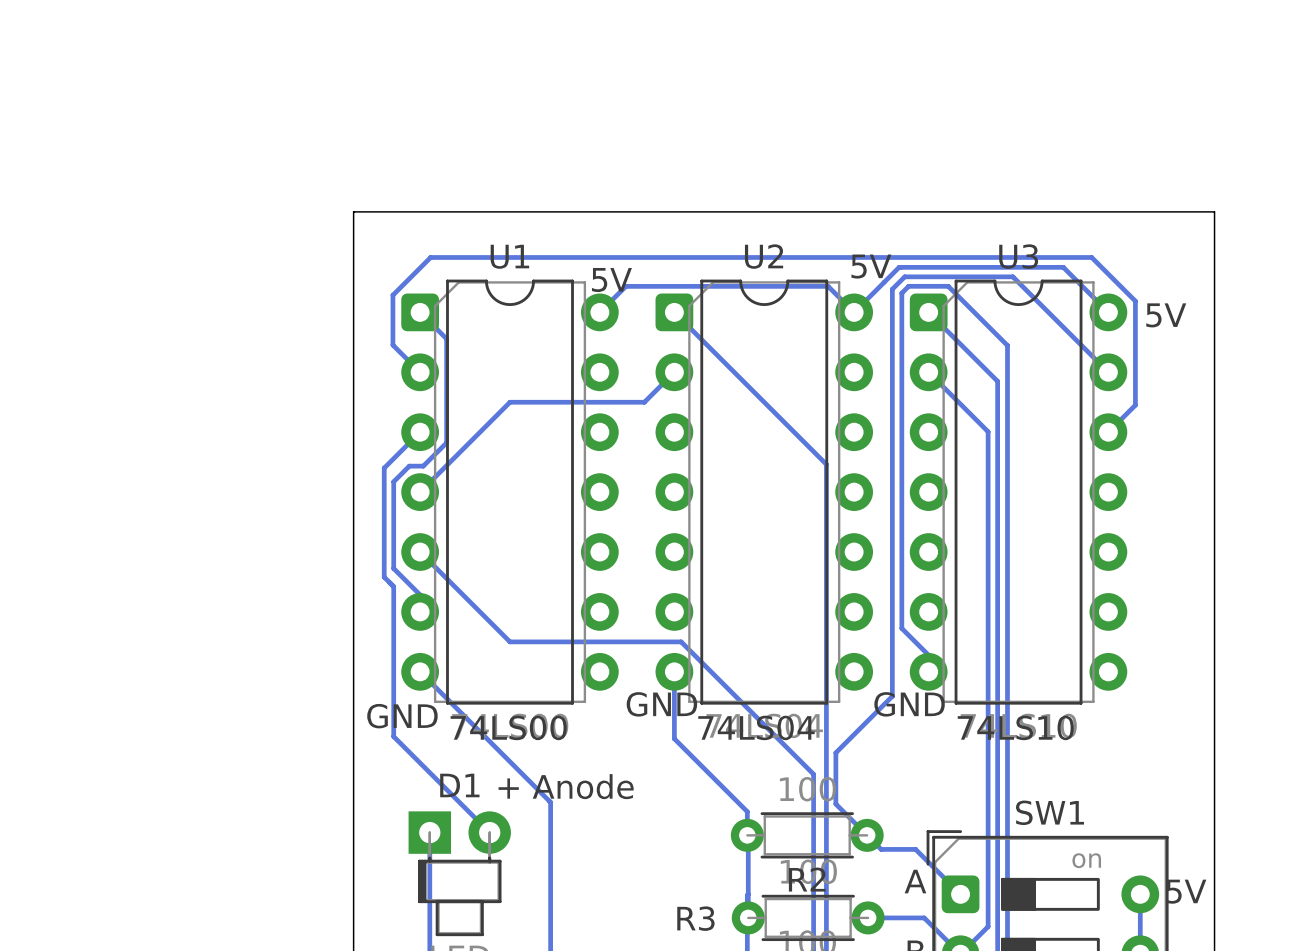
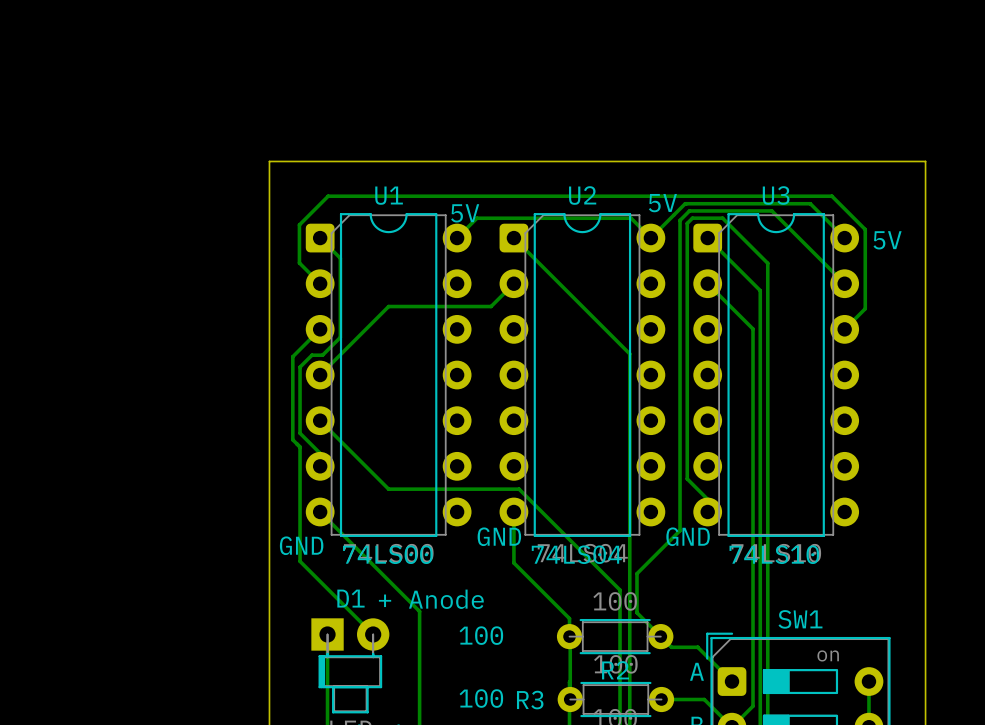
text: none -> 100 (481, 635)
text: 5V (1186, 891) -> none
text: none -> 100 (481, 698)

